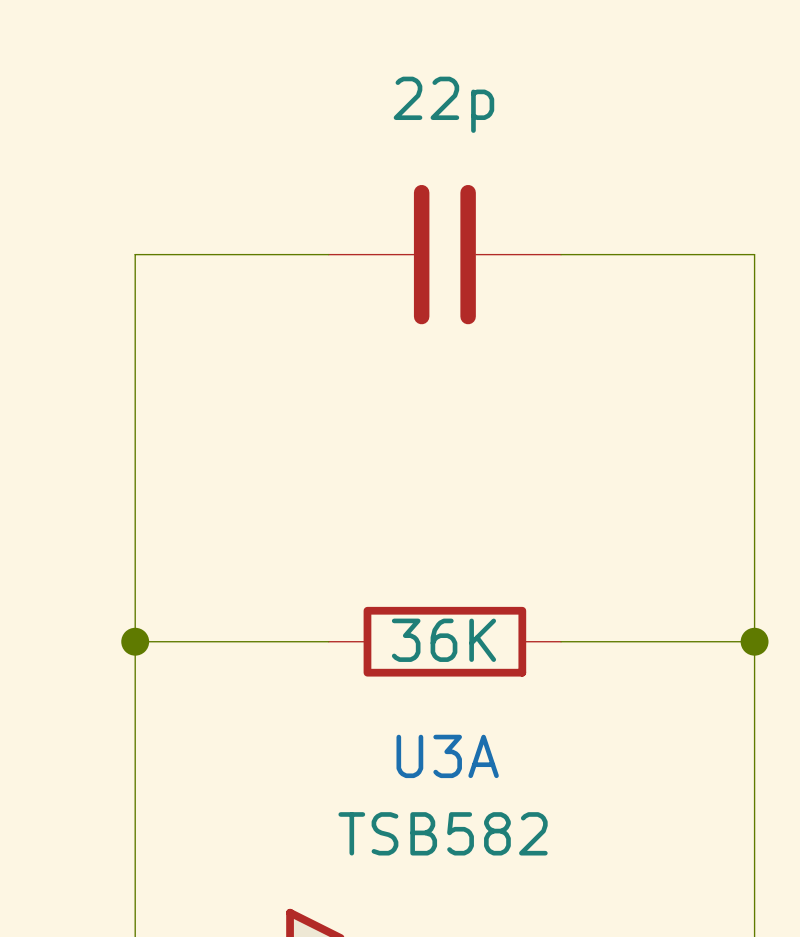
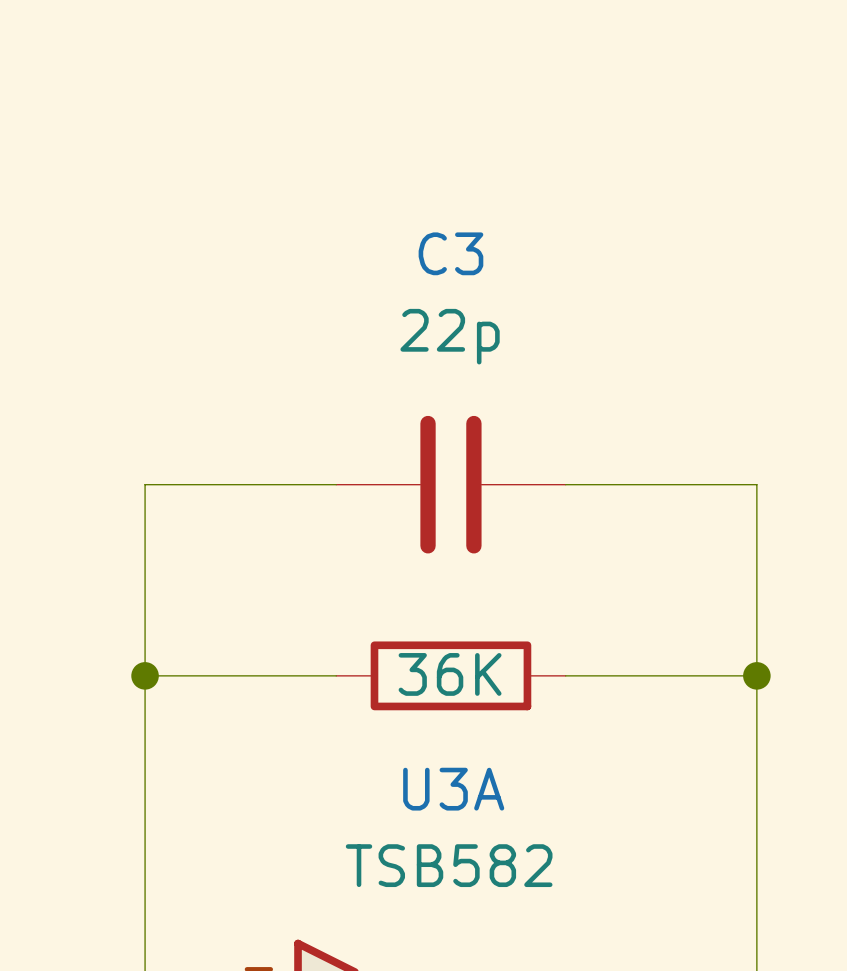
wire: (328, 254) (135, 254) (135, 448) -> (336, 484) (145, 484)
part: 22p (444, 254) -> none
wire: (561, 254) (754, 254) (754, 448) -> (565, 484) (756, 484)
C3: none -> 22p (450, 484)

